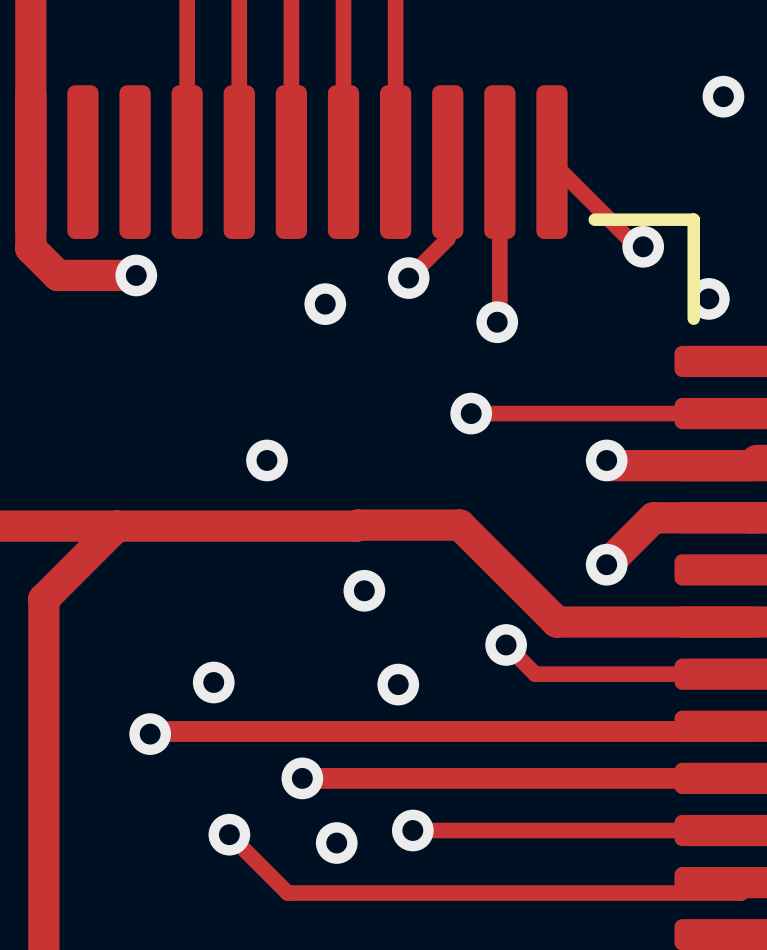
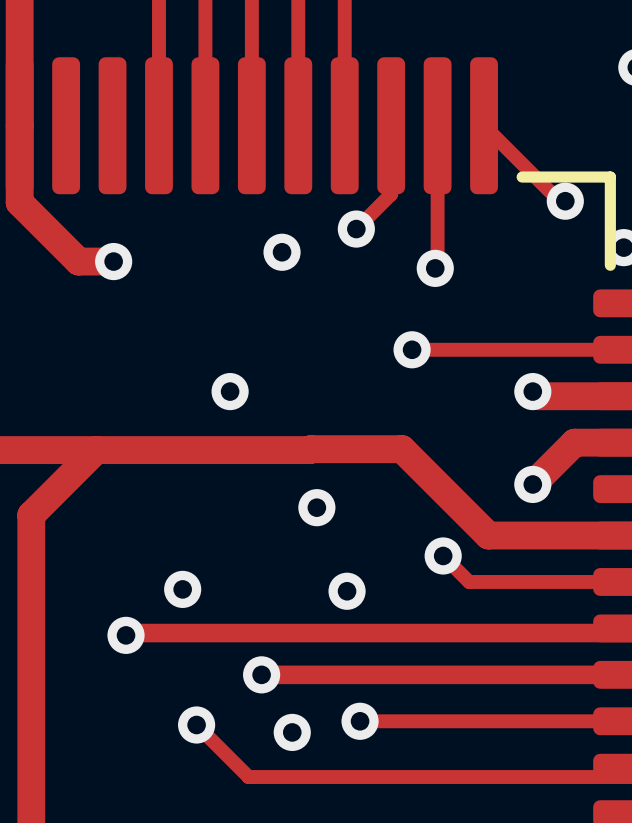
track: (57, 275) (136, 275) -> (43, 226) (78, 261) (113, 261)
via position: (136, 275) -> (113, 261)

